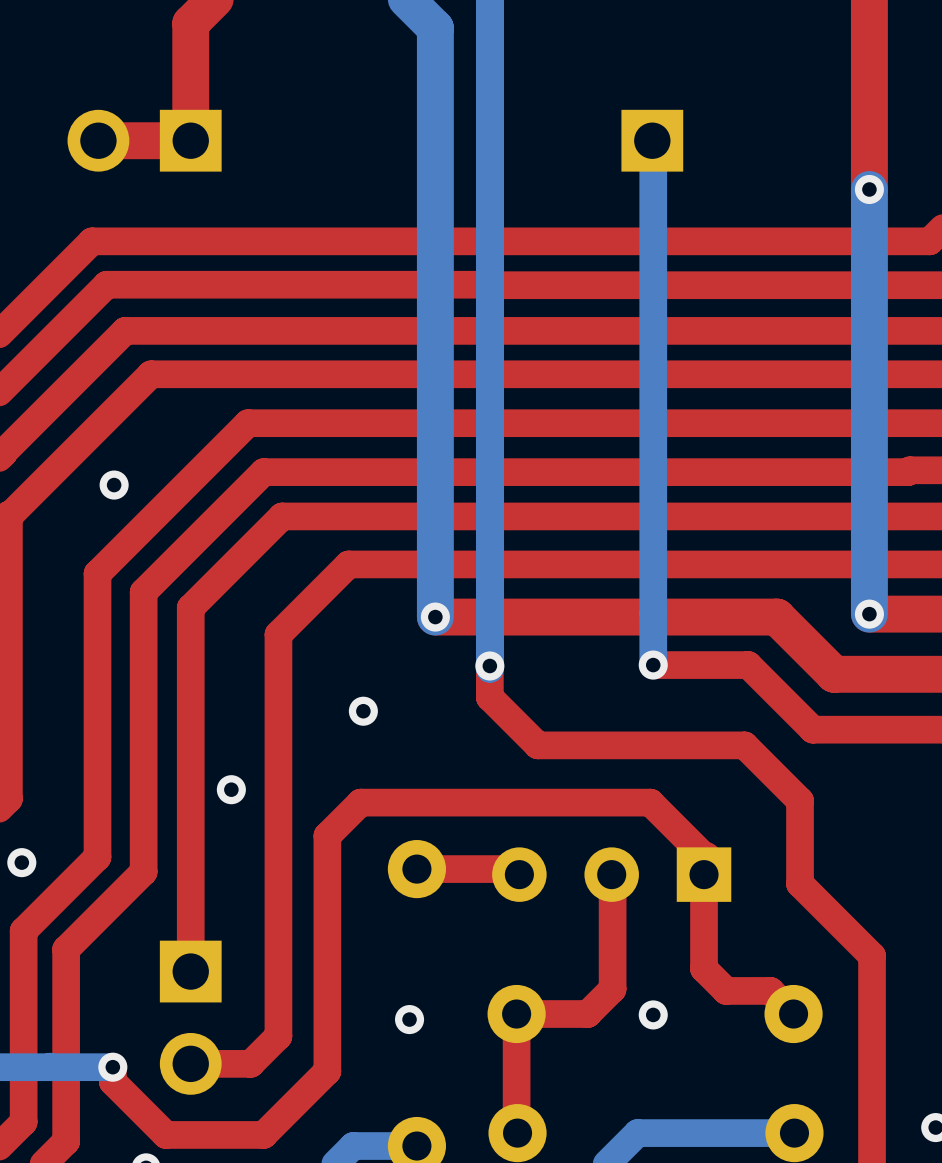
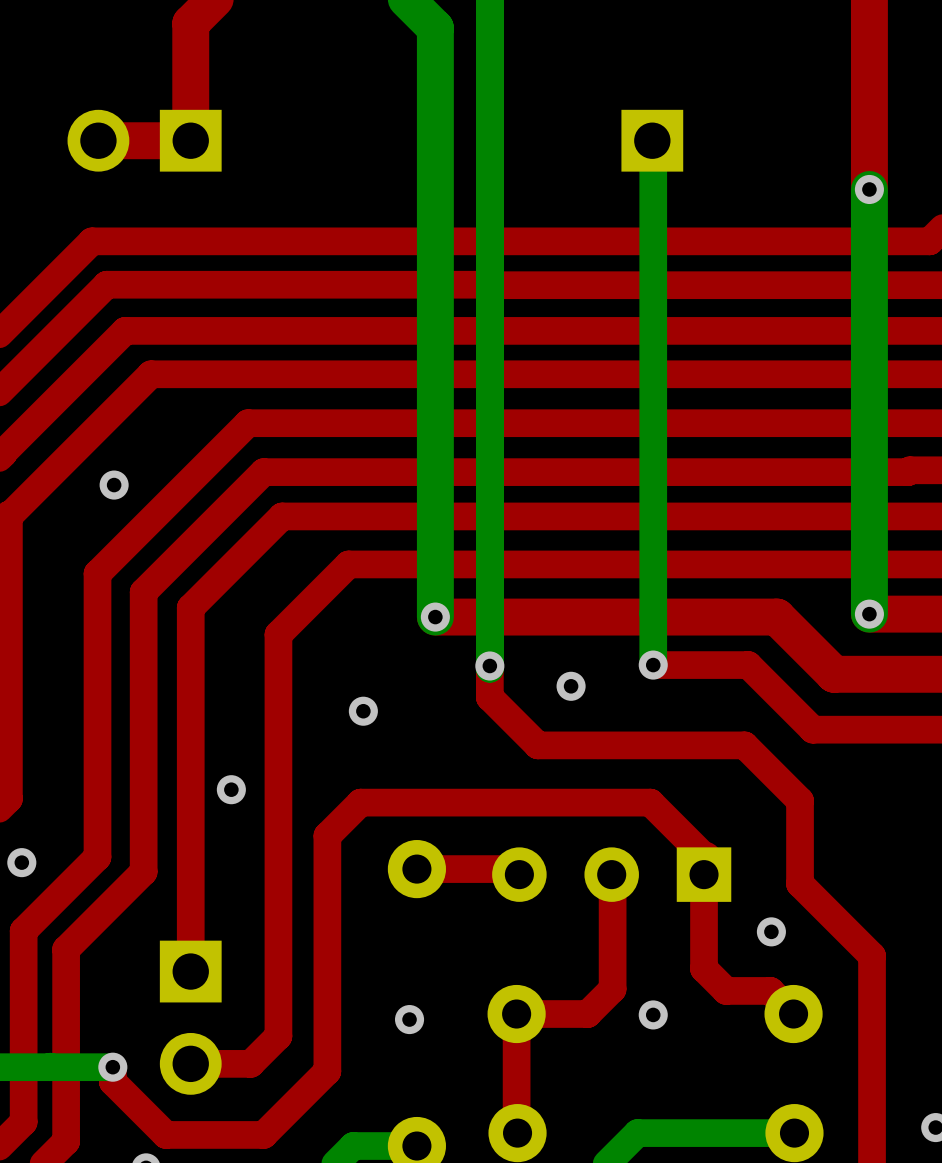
via: none -> (571, 686)
via: none -> (771, 931)

